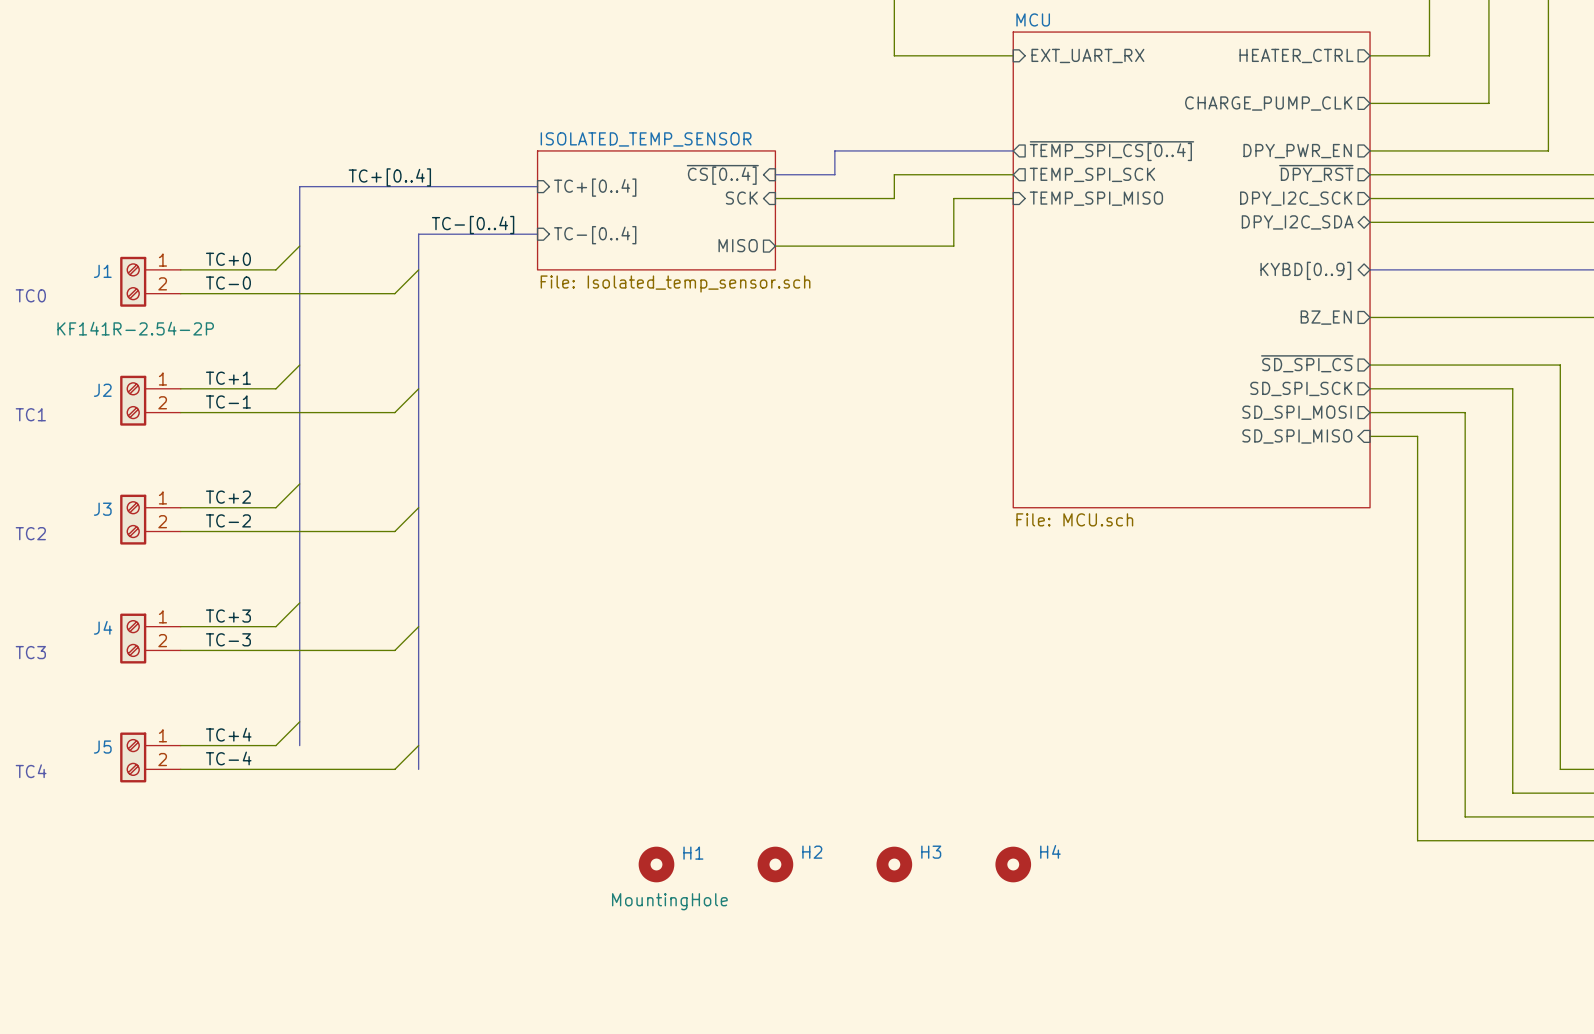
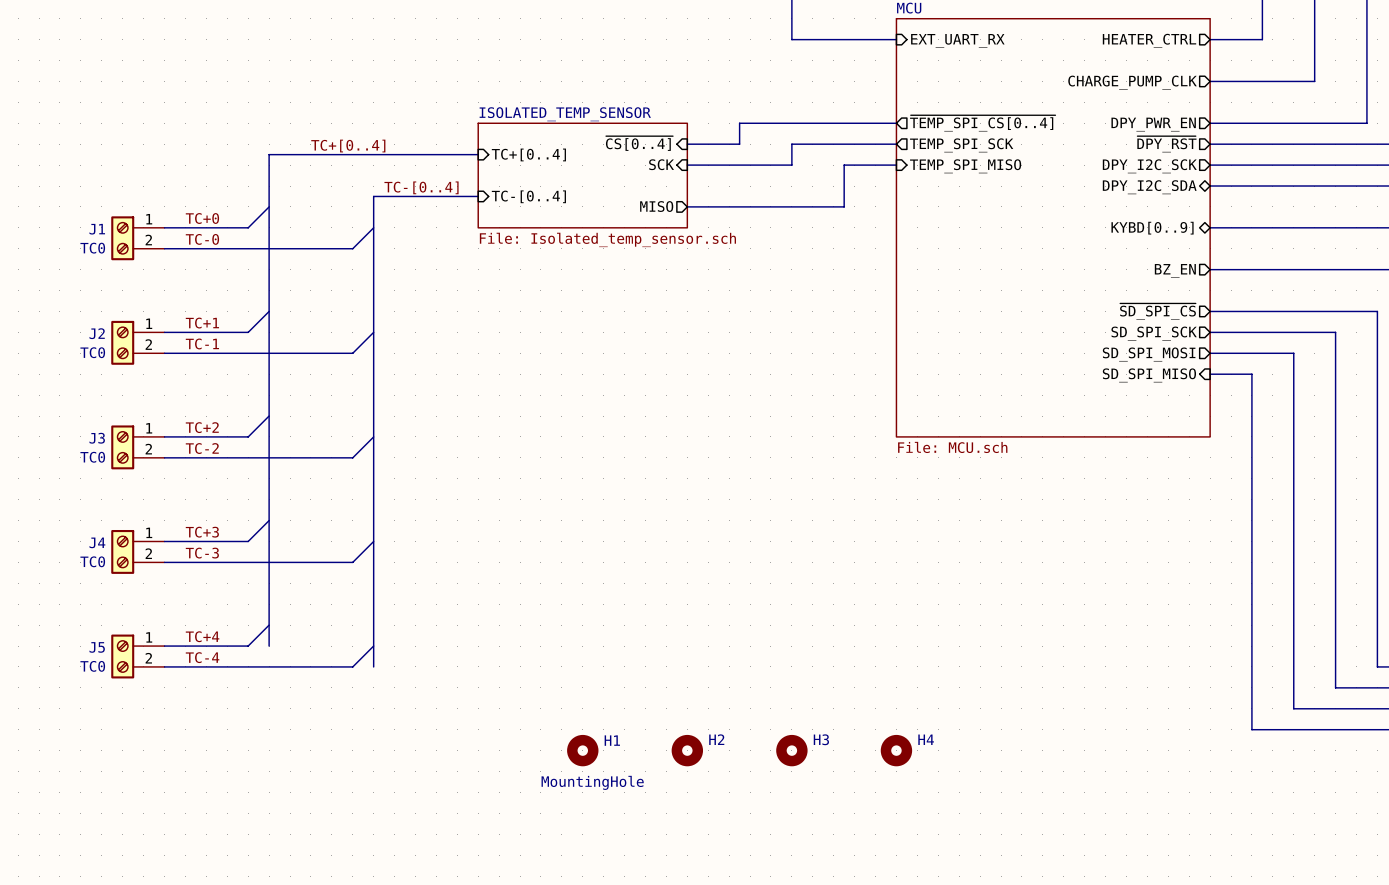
text: TC0 (30, 295) -> none
J1 value: KF141R-2.54-2P (135, 328) -> TC0 (92, 248)
J2 value: none -> TC0 (92, 352)
text: TC1 (30, 414) -> none
J3 value: none -> TC0 (92, 457)
text: TC2 (30, 533) -> none
J4 value: none -> TC0 (92, 561)
text: TC3 (30, 652) -> none
J5 value: none -> TC0 (92, 666)
text: TC4 (31, 771) -> none

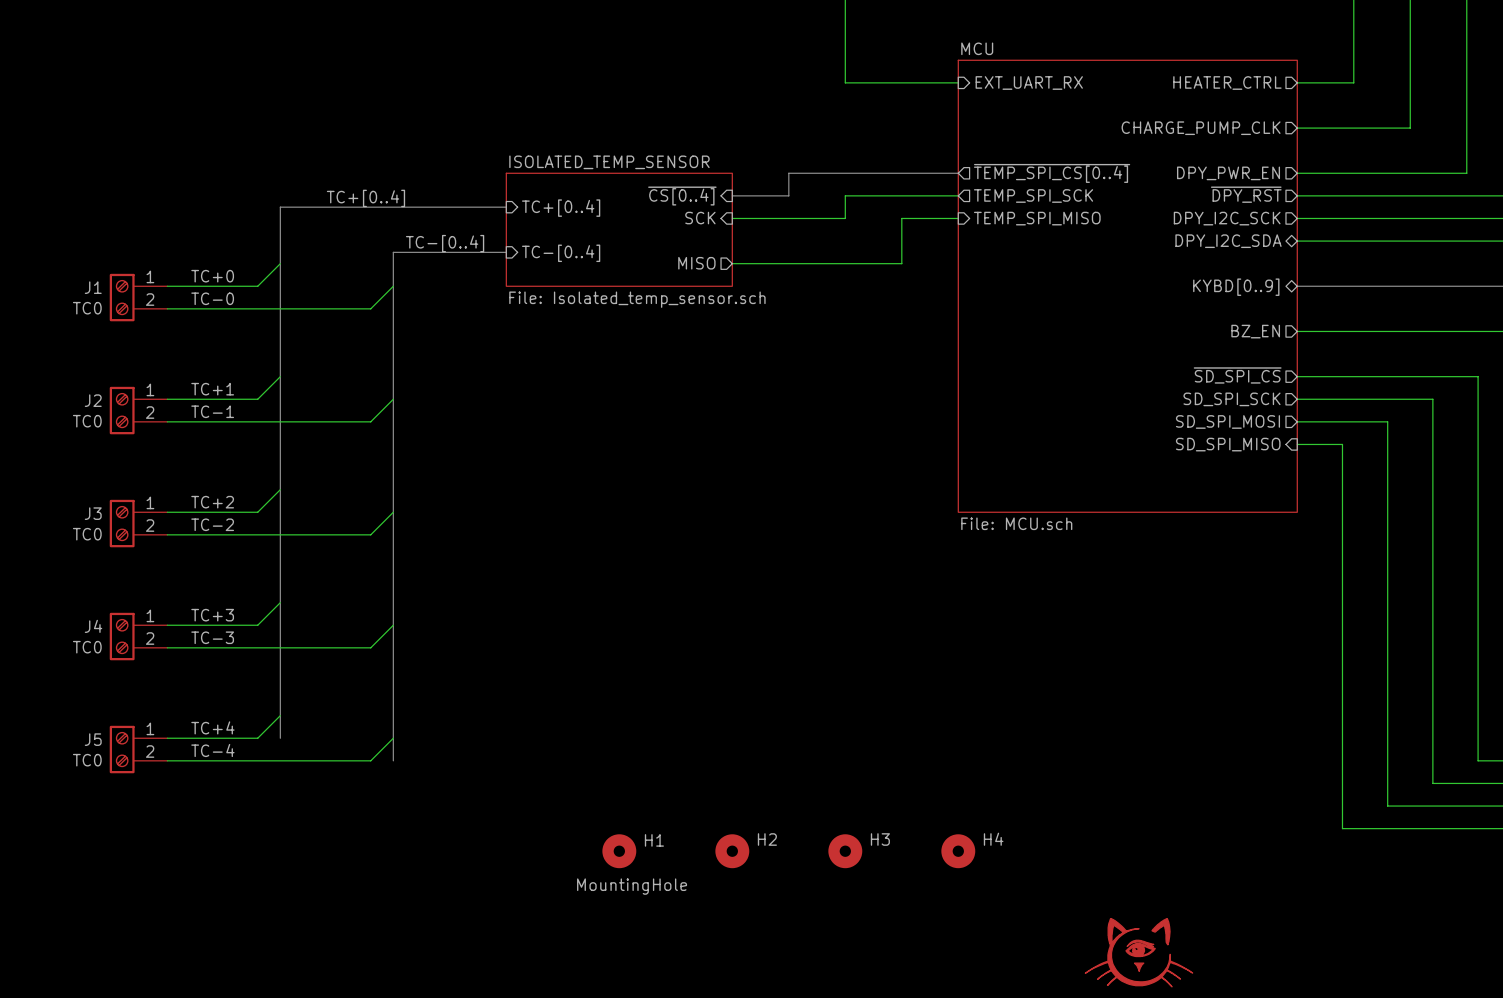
part: none -> (1138, 952)

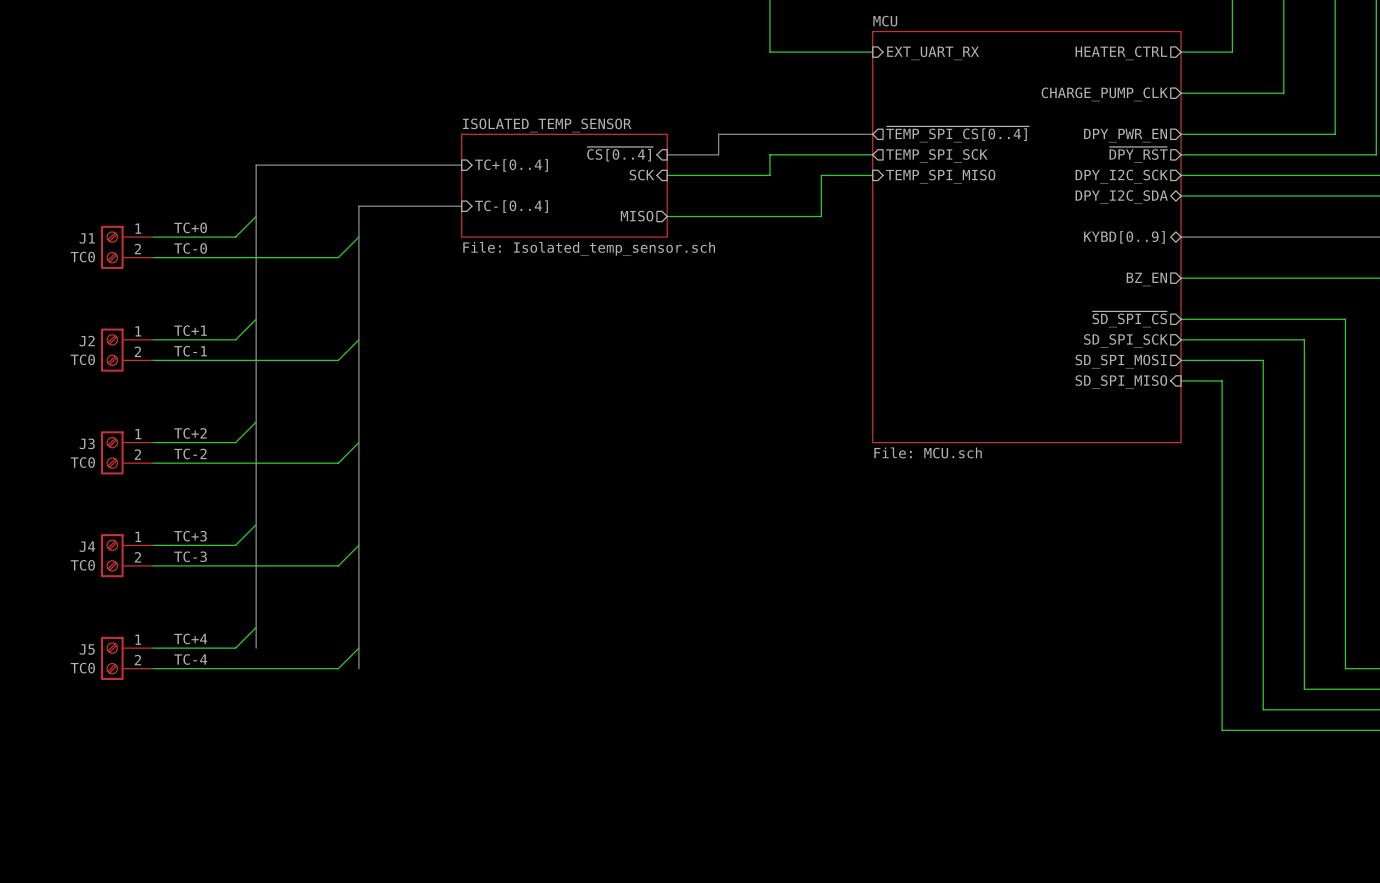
label: TC+[0..4] (365, 198) -> none
label: TC-[0..4] (445, 243) -> none
H1: MountingHole (619, 851) -> none
H2: (732, 851) -> none
H3: (845, 851) -> none
H4: (958, 851) -> none
part: (1138, 952) -> none

